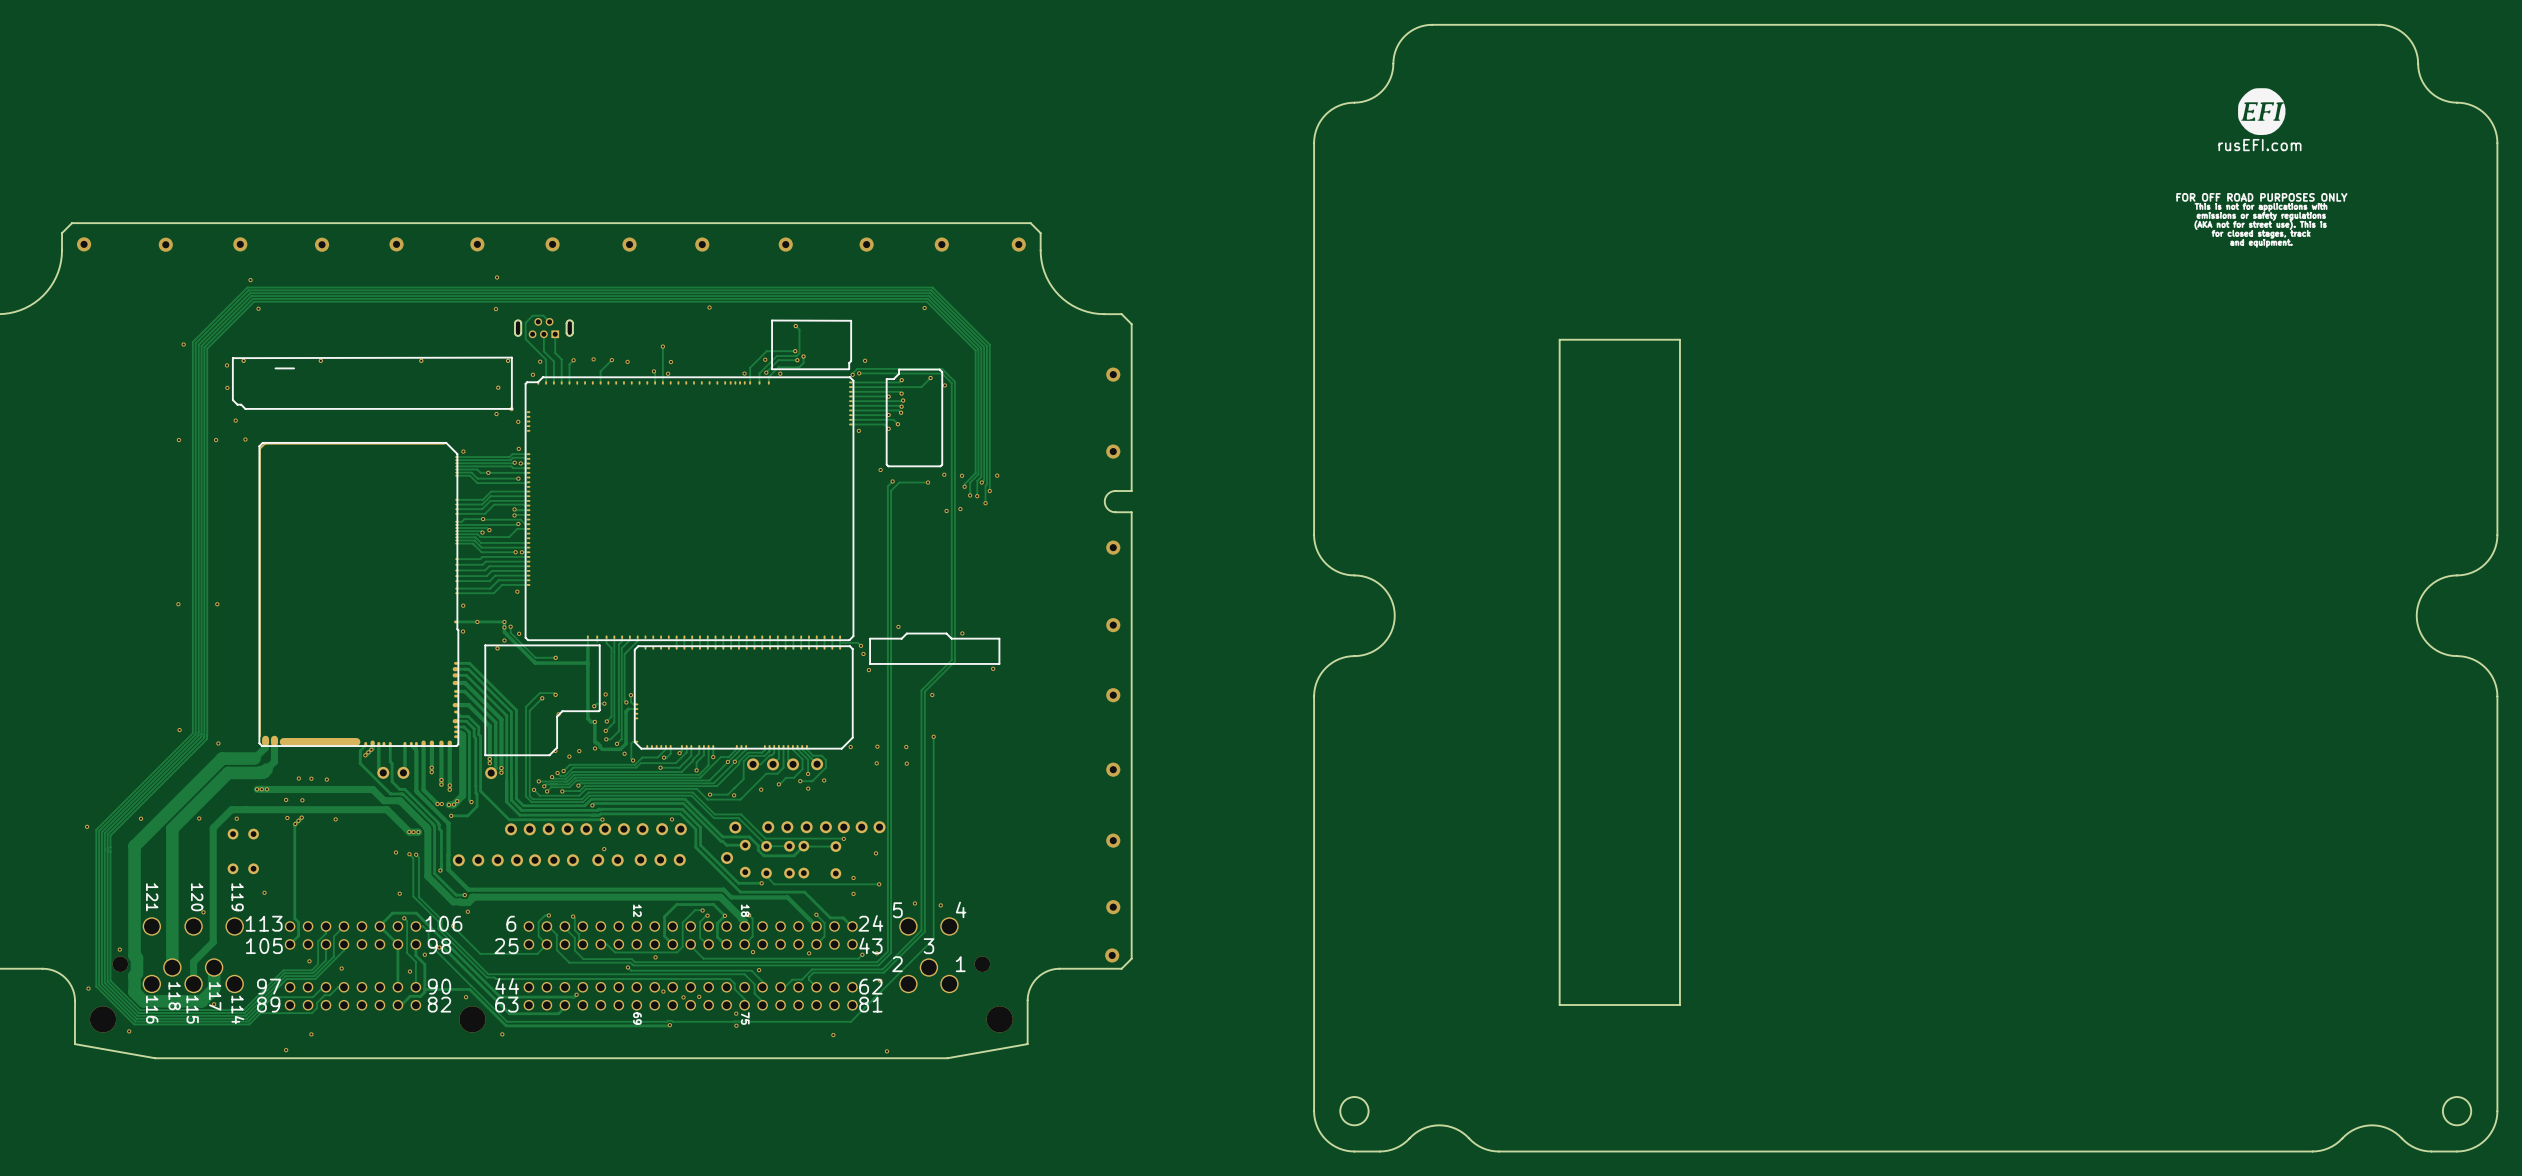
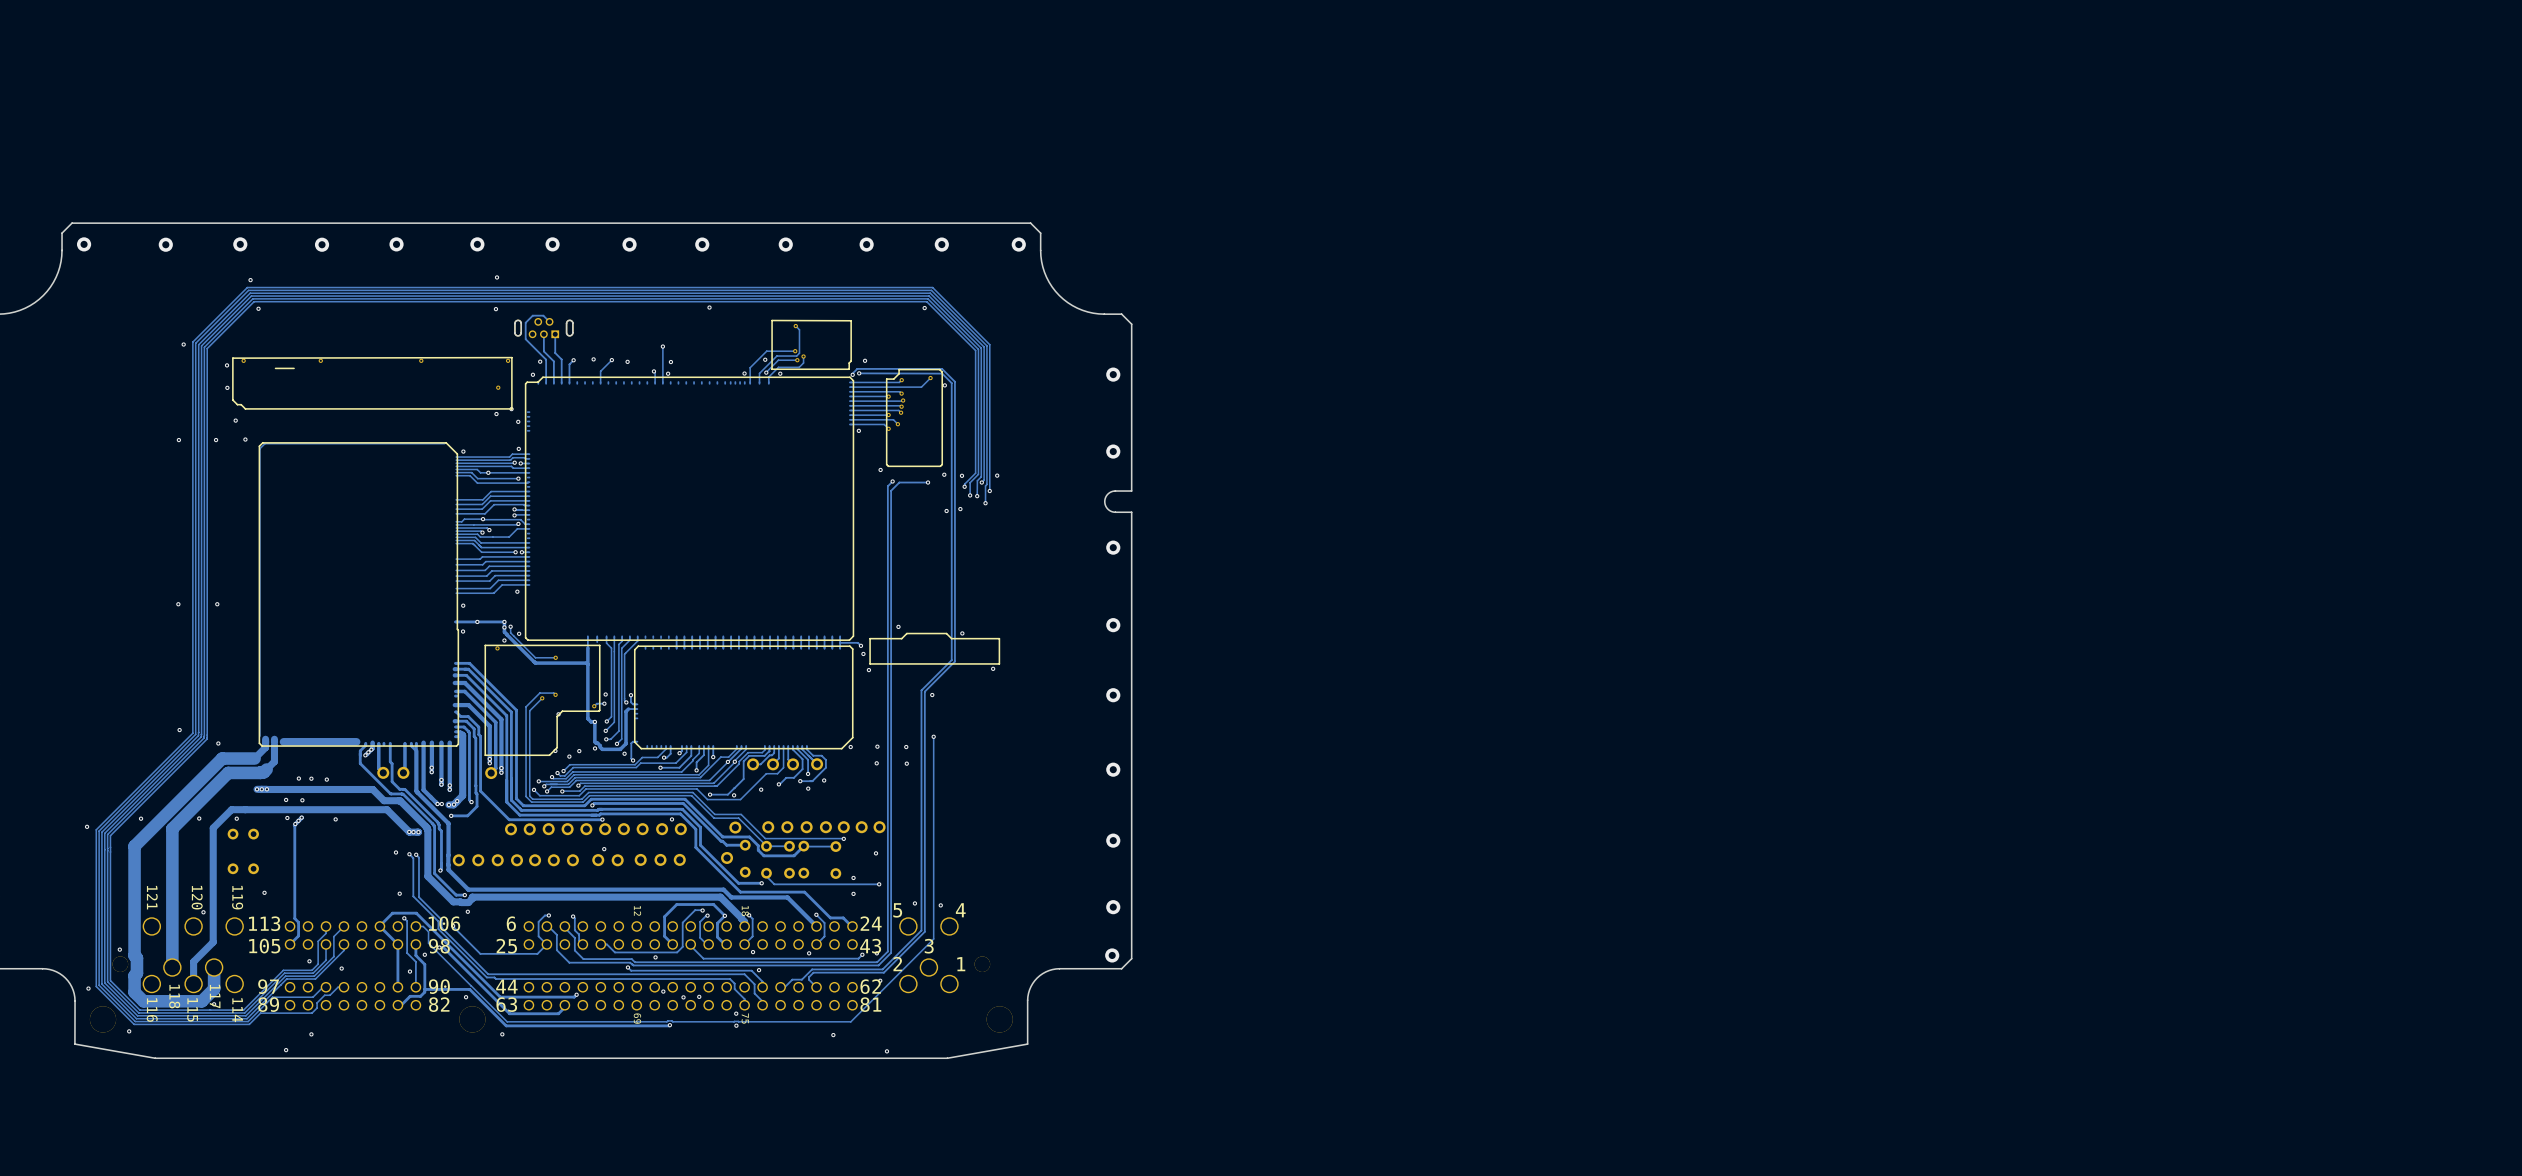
board edge: (2379, 24) (1428, 24) (1413, 29) (1399, 42) (1395, 52) (1390, 78) (1379, 93) (1365, 100) (1338, 105) (1325, 114) (1317, 127) (1314, 143) (1314, 539) (1318, 554) (1332, 568) (1342, 573) (1366, 577) (1381, 585) (1391, 599) (1394, 615) (1391, 632) (1381, 645) (1366, 654) (1342, 657) (1332, 662) (1318, 677) (1314, 692) (1314, 1111) (1317, 1126) (1325, 1139) (1335, 1146) (1346, 1150) (1384, 1151) (1399, 1146) (1423, 1128) (1439, 1125) (1455, 1128) (1478, 1146) (1498, 1151) (2312, 1151) (2328, 1148) (2352, 1130) (2372, 1125) (2388, 1128) (2411, 1146) (2427, 1151) (2464, 1150) (2476, 1146) (2485, 1139) (2494, 1126) (2497, 1111) (2497, 692) (2492, 677) (2479, 662) (2468, 657) (2444, 654) (2430, 645) (2420, 632) (2416, 615) (2420, 599) (2430, 585) (2444, 577) (2468, 573) (2479, 568) (2490, 557) (2496, 542) (2497, 139) (2492, 123) (2479, 109) (2468, 104) (2442, 99) (2429, 91) (2421, 78) (2416, 52) (2409, 39) (2397, 29) (2379, 24) -> none
drawing: [2238, 88, 2286, 136] -> none
text: rusEFI.com (2259, 145) -> none
drawing: [2176, 193, 2348, 248] -> none
board edge: (1679, 339) (1679, 1005) (1559, 1005) (1559, 339) (1679, 339) -> none
round board edge: [1339, 1096, 1370, 1127] -> none
round board edge: [2442, 1096, 2472, 1127] -> none

